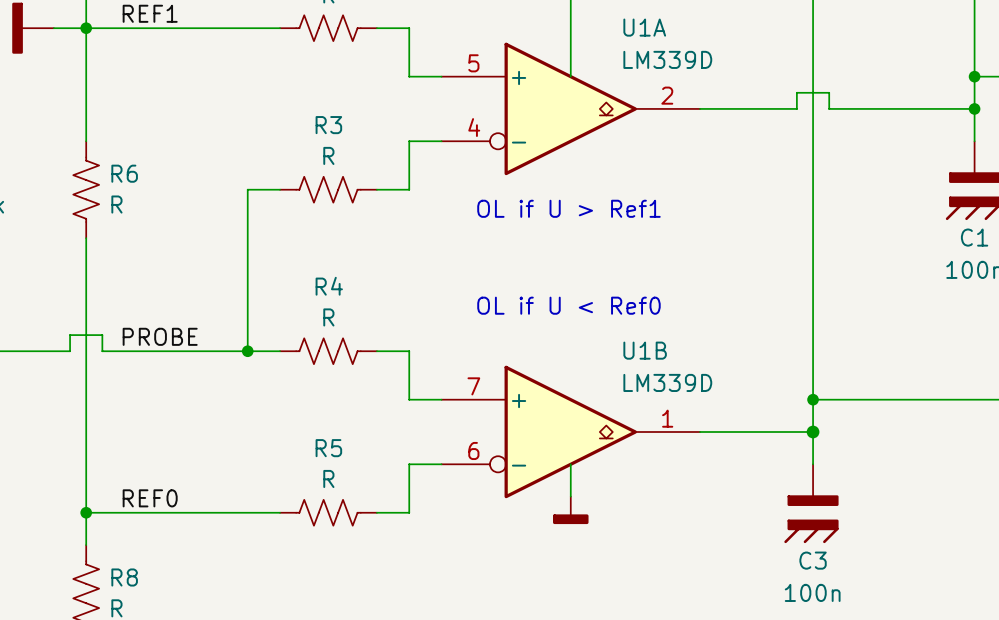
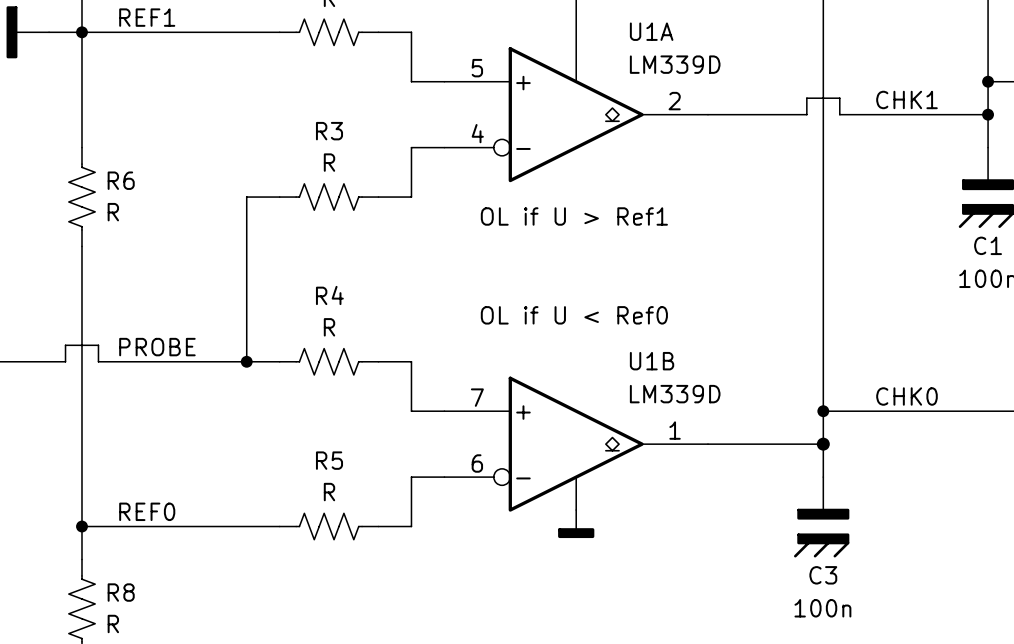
label: none -> CHK1 (906, 99)
label: none -> CHK0 (906, 396)

